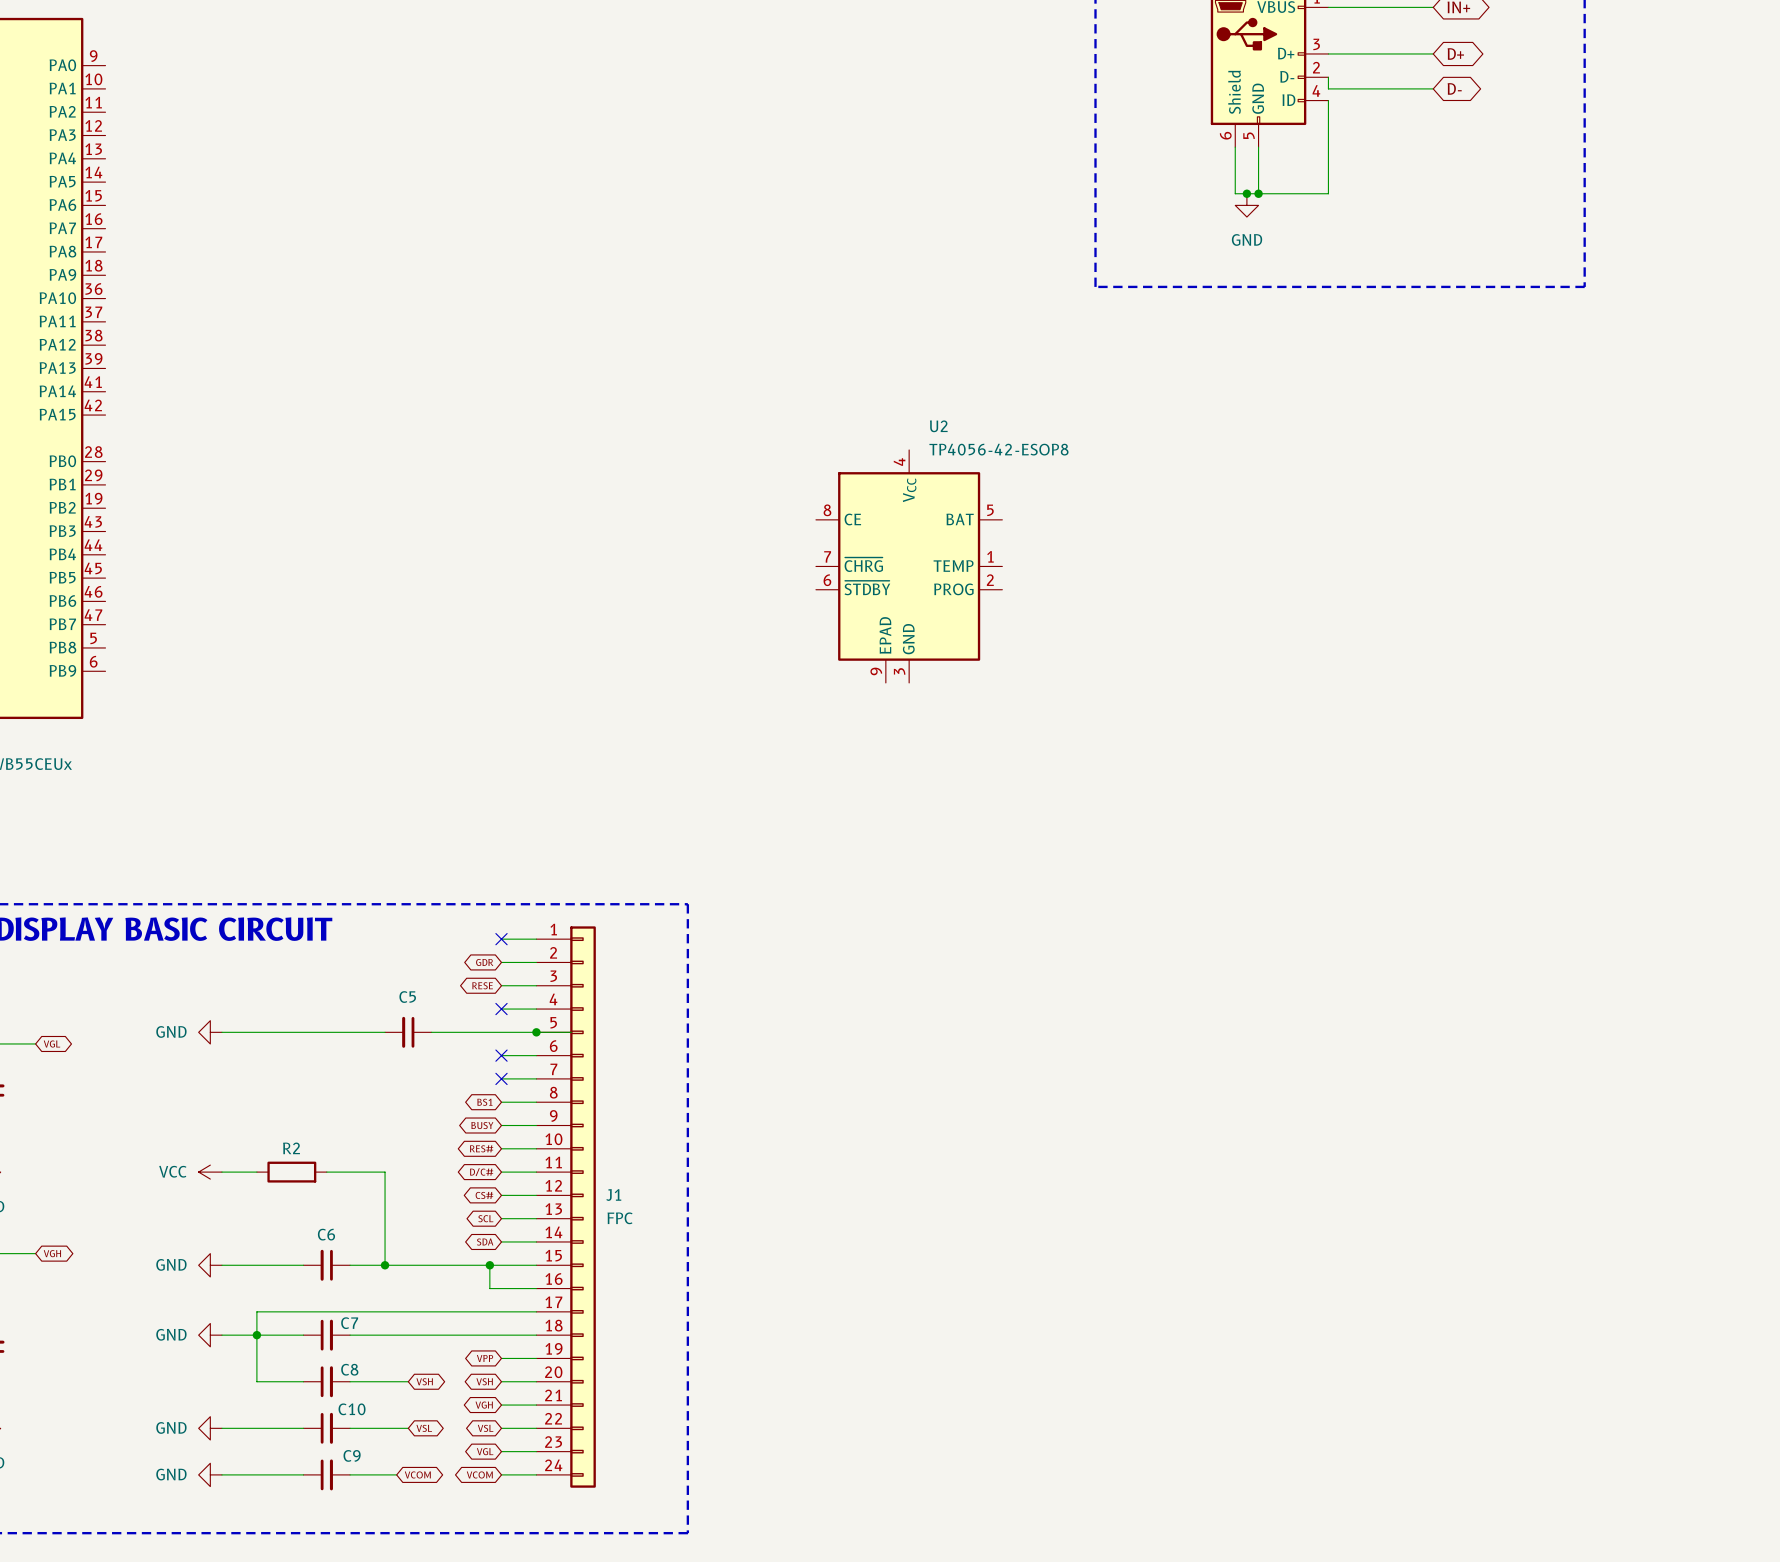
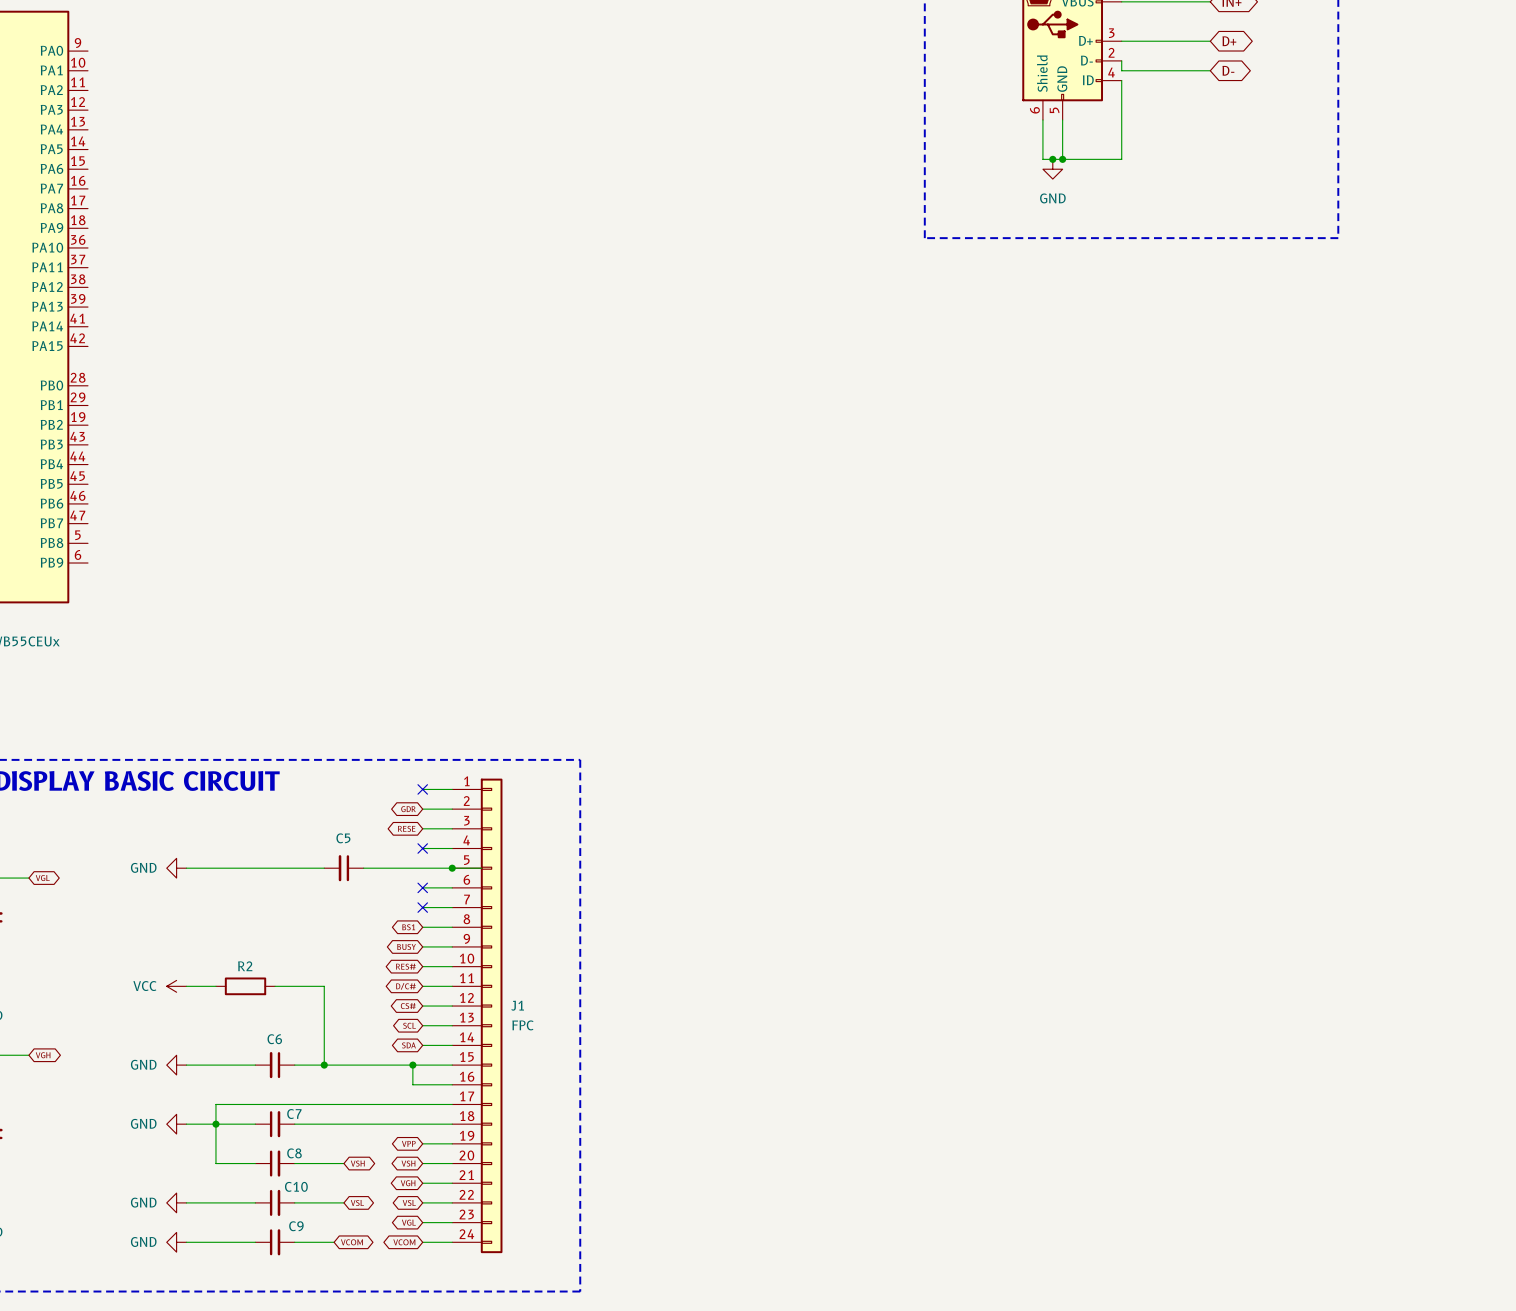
U2: TP4056-42-ESOP8 (909, 566) -> none

